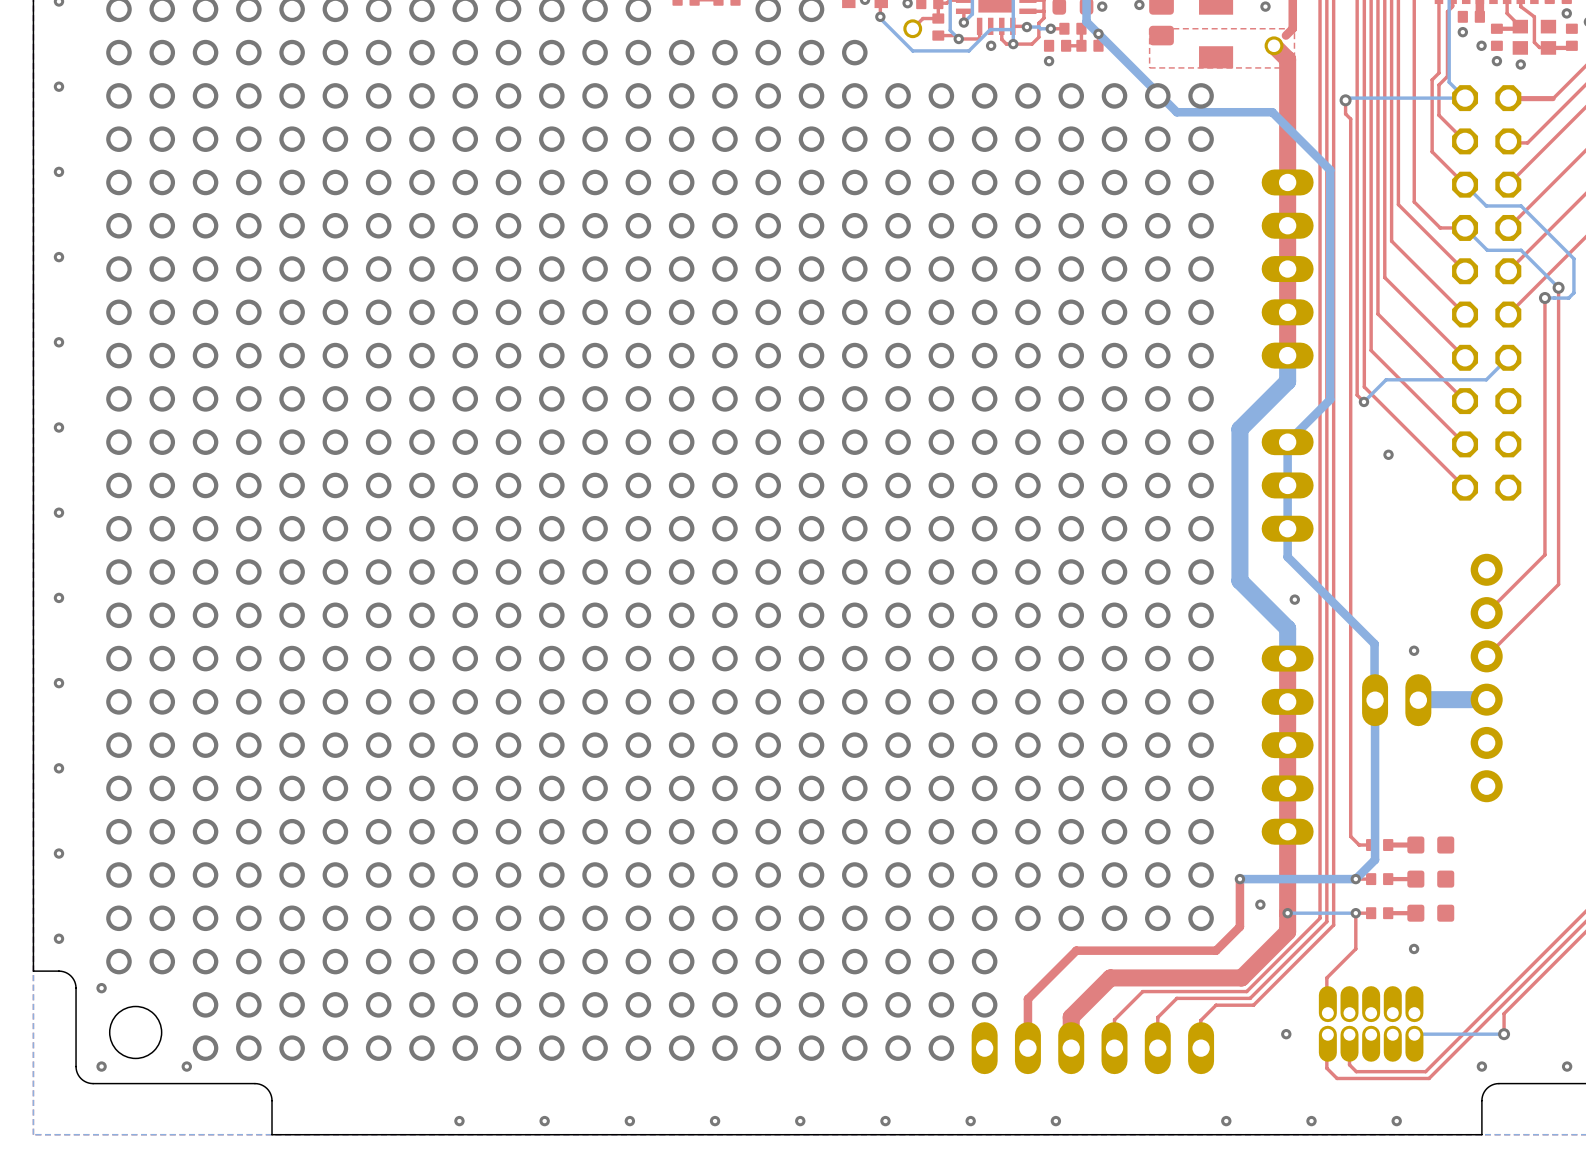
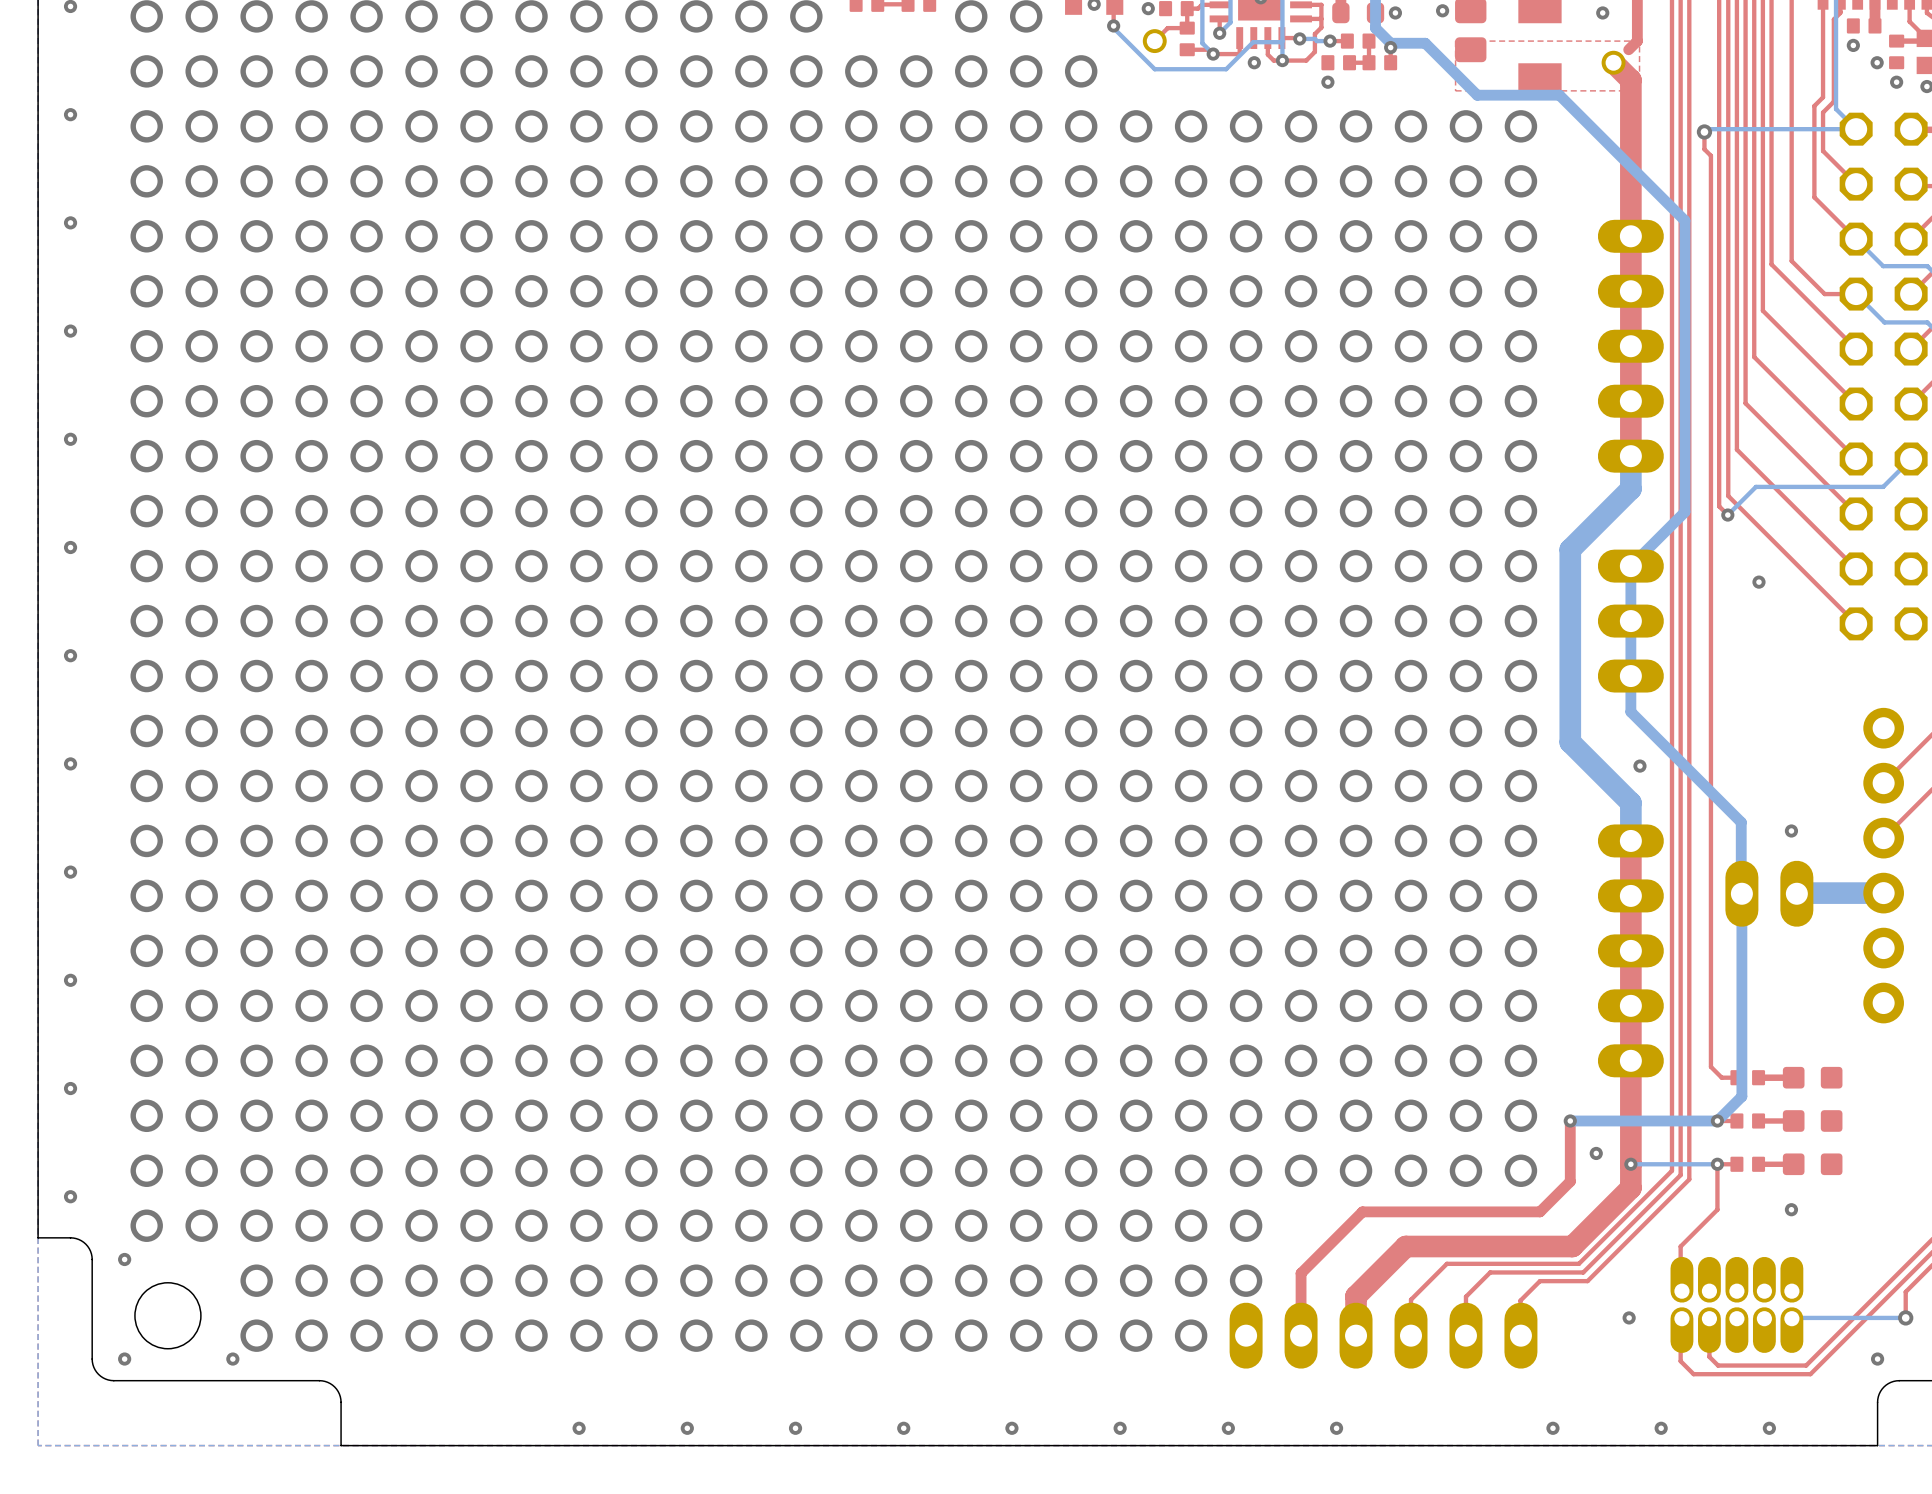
bottom track: (1086, 18) (1086, 21) (1176, 112) (1272, 112) -> (1375, 28) (1390, 43) (1425, 43) (1477, 95) (1559, 95) (1611, 147)

